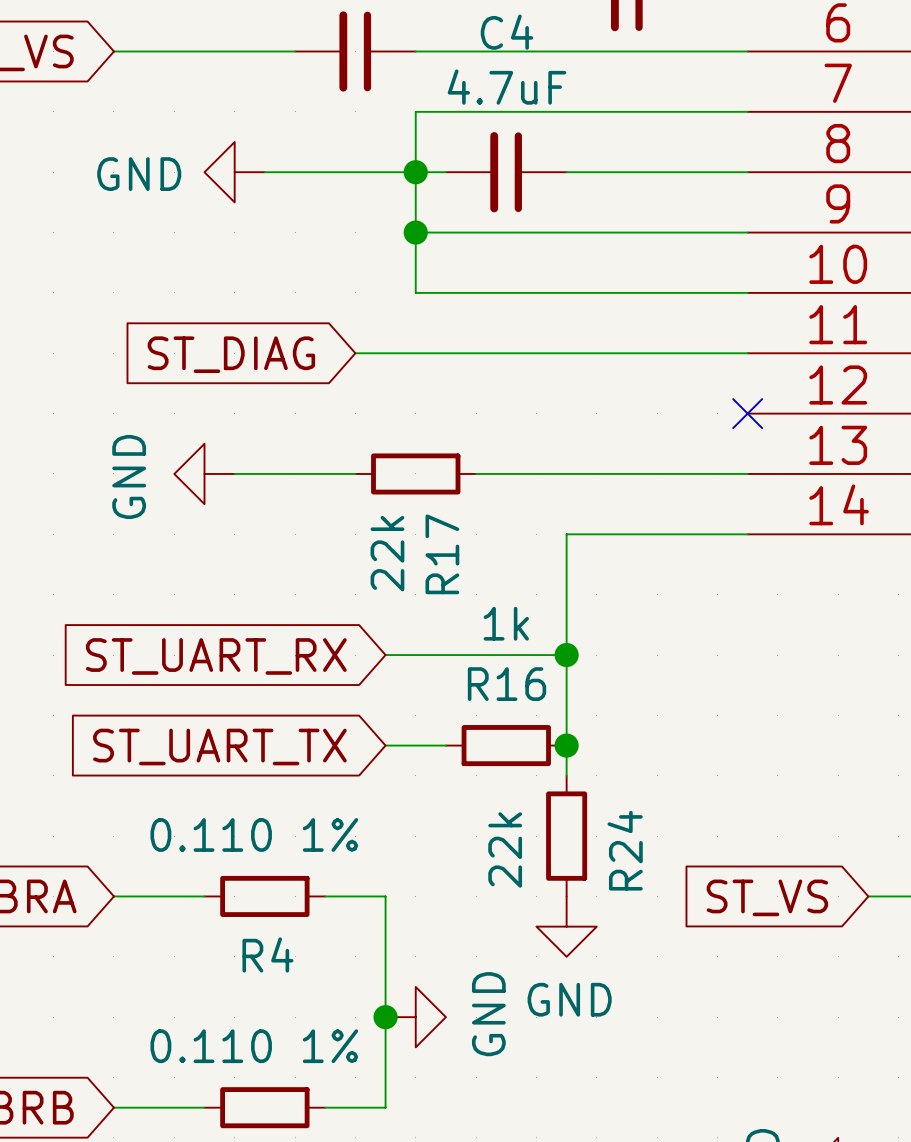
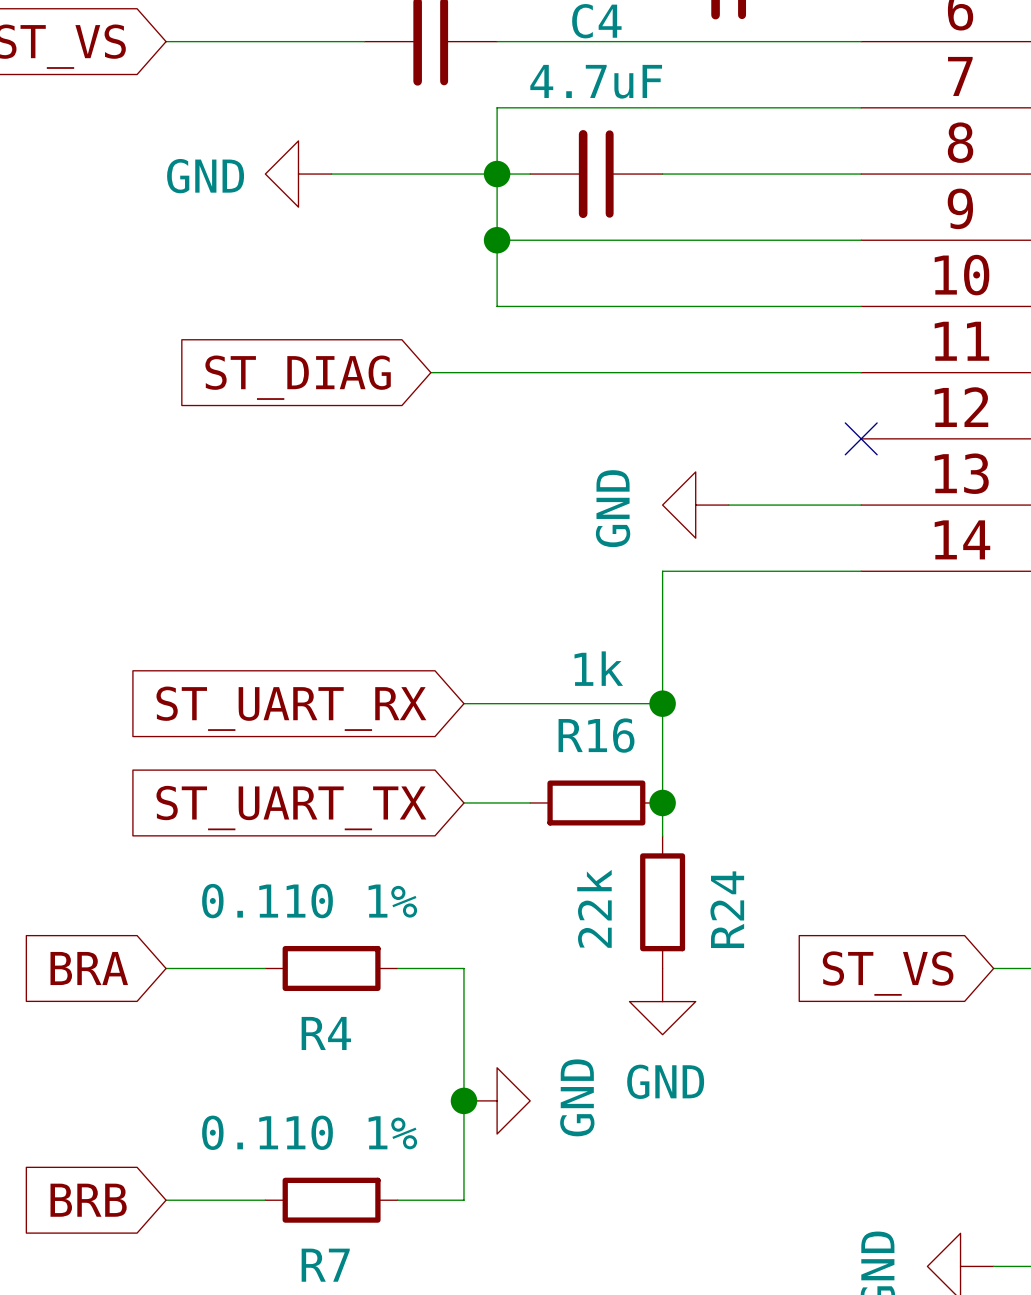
power symbol position: GND (204, 473) -> GND (695, 505)
wire: (234, 473) (355, 473) -> none
R17: 22k (415, 473) -> none
wire: (476, 473) (626, 473) -> none

